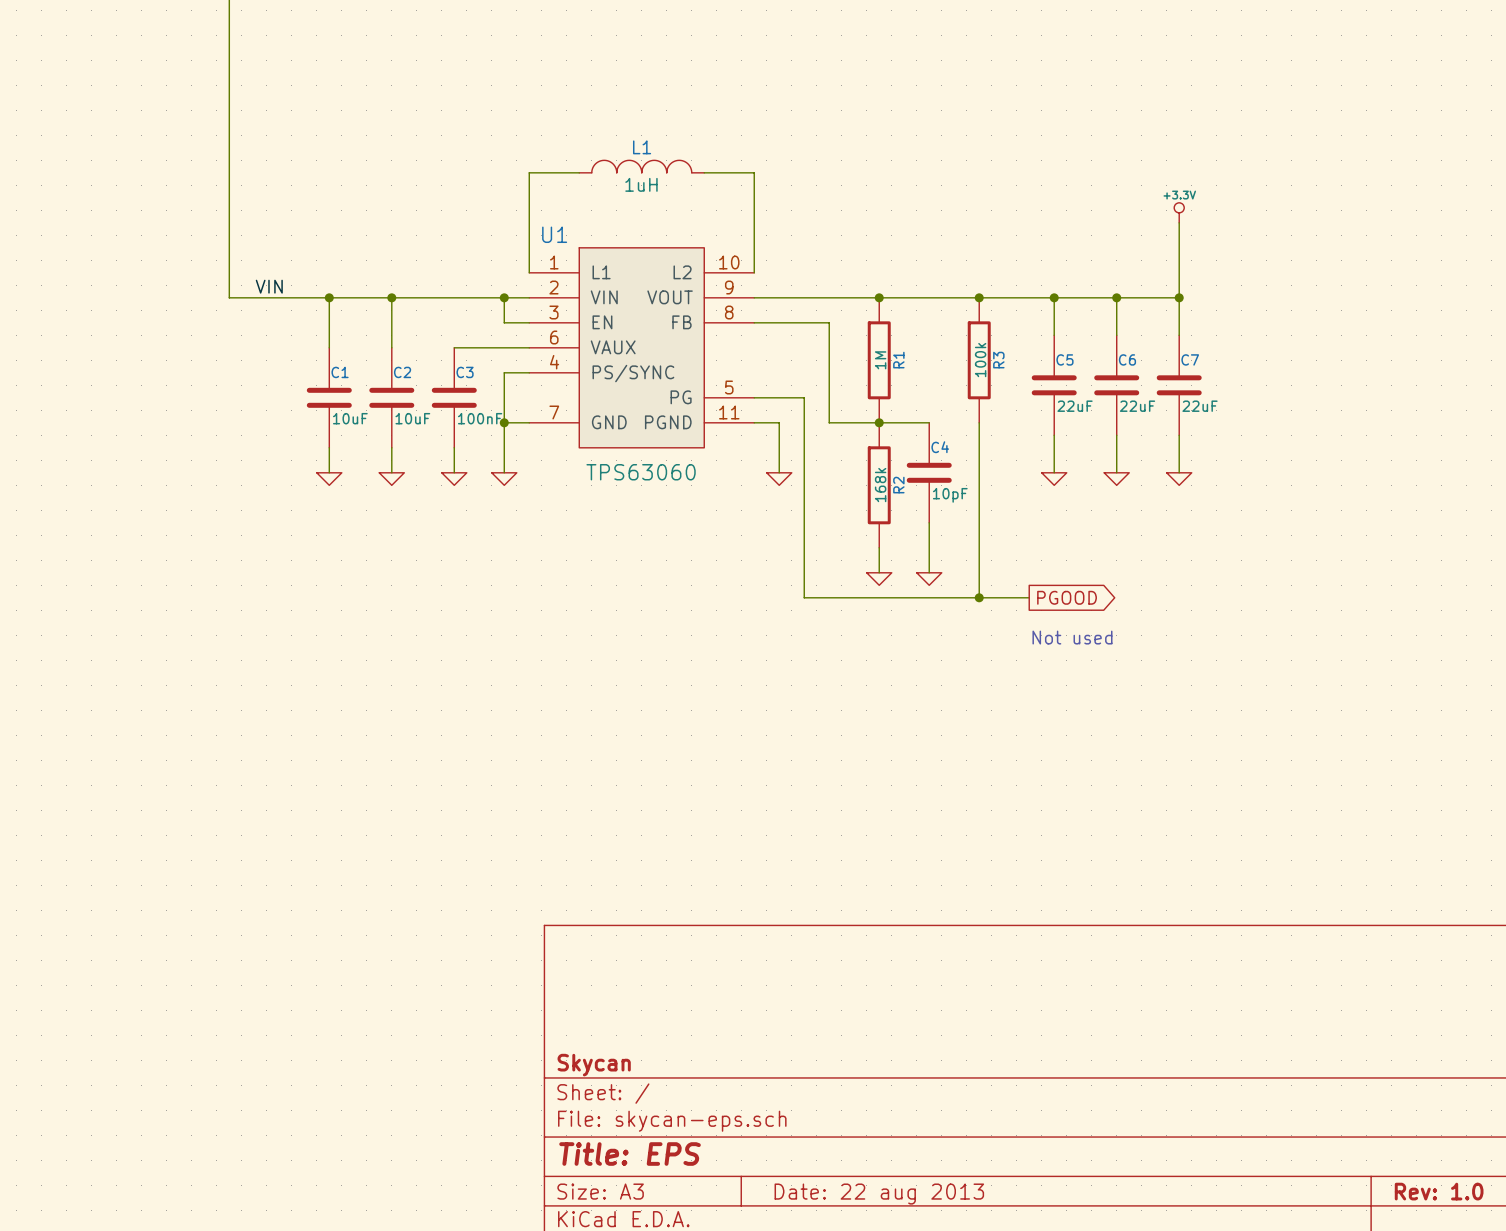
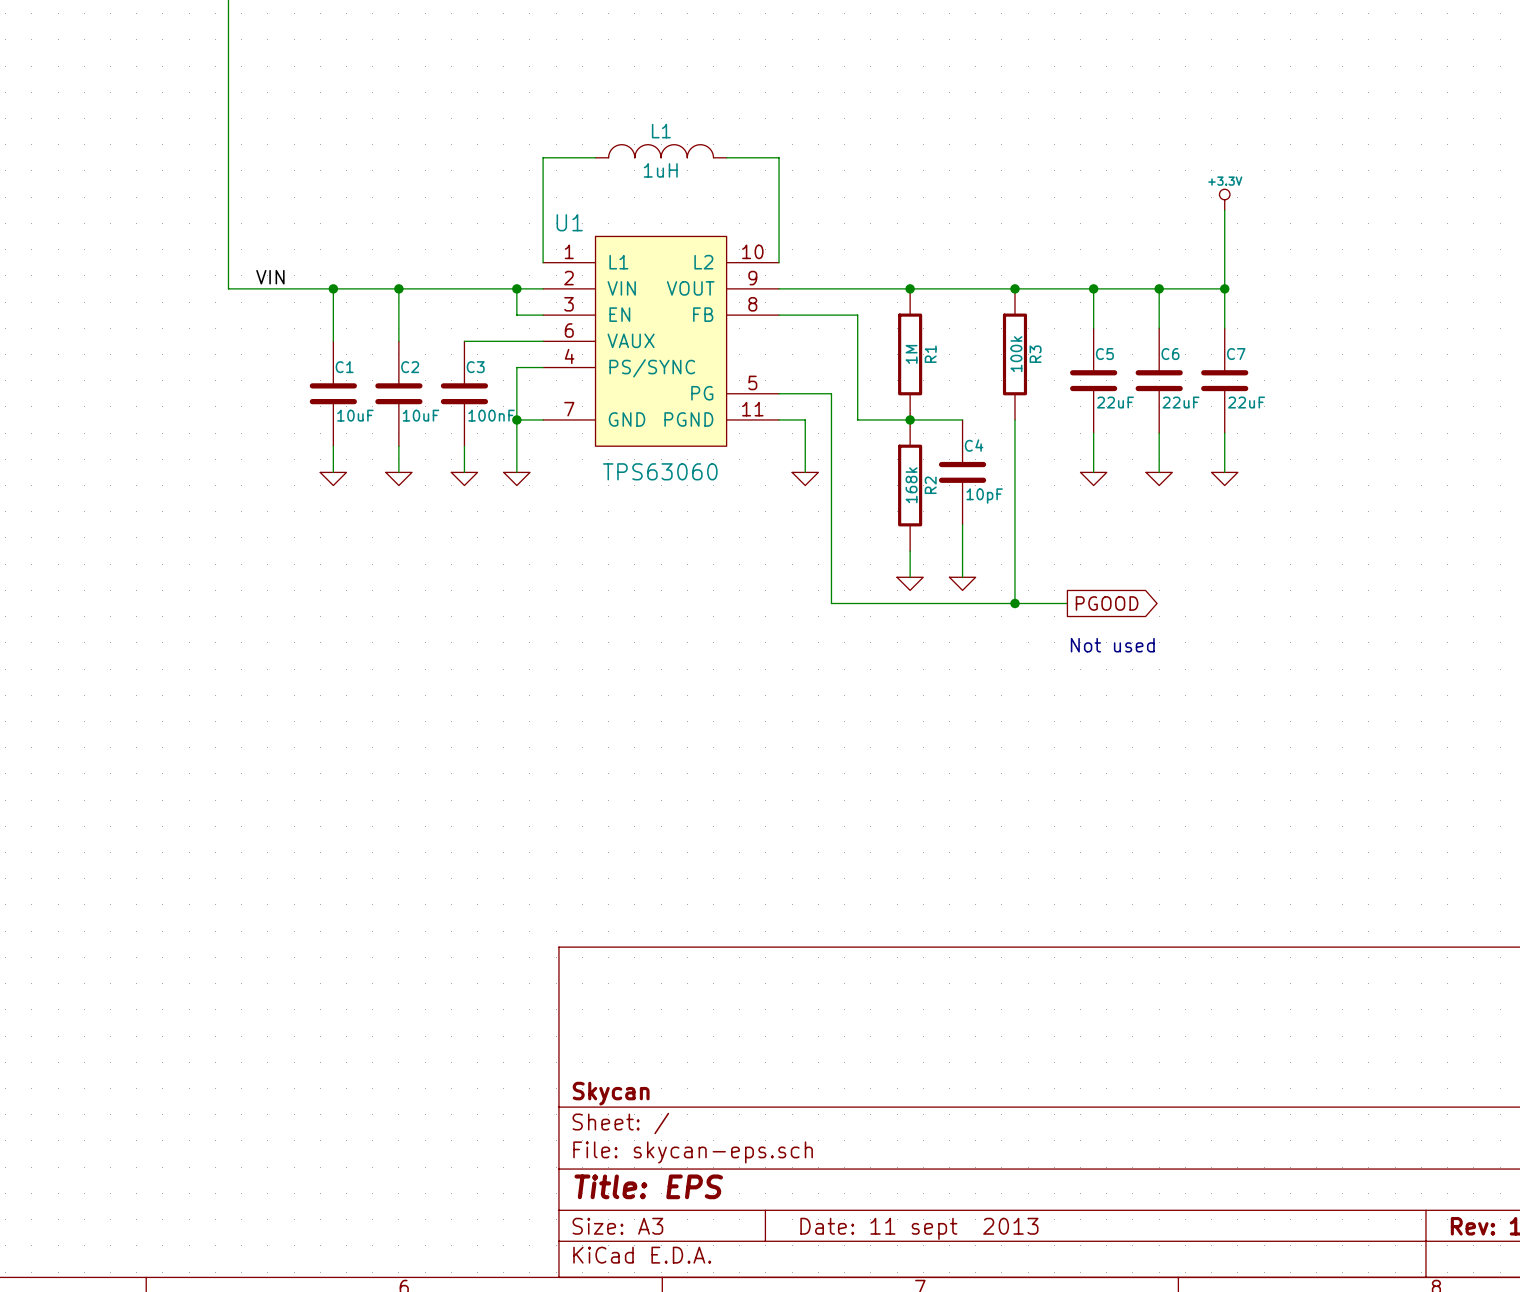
title block: Date: 22 aug 2013 (879, 1194) -> Date: 11 sept 2013 (919, 1228)

